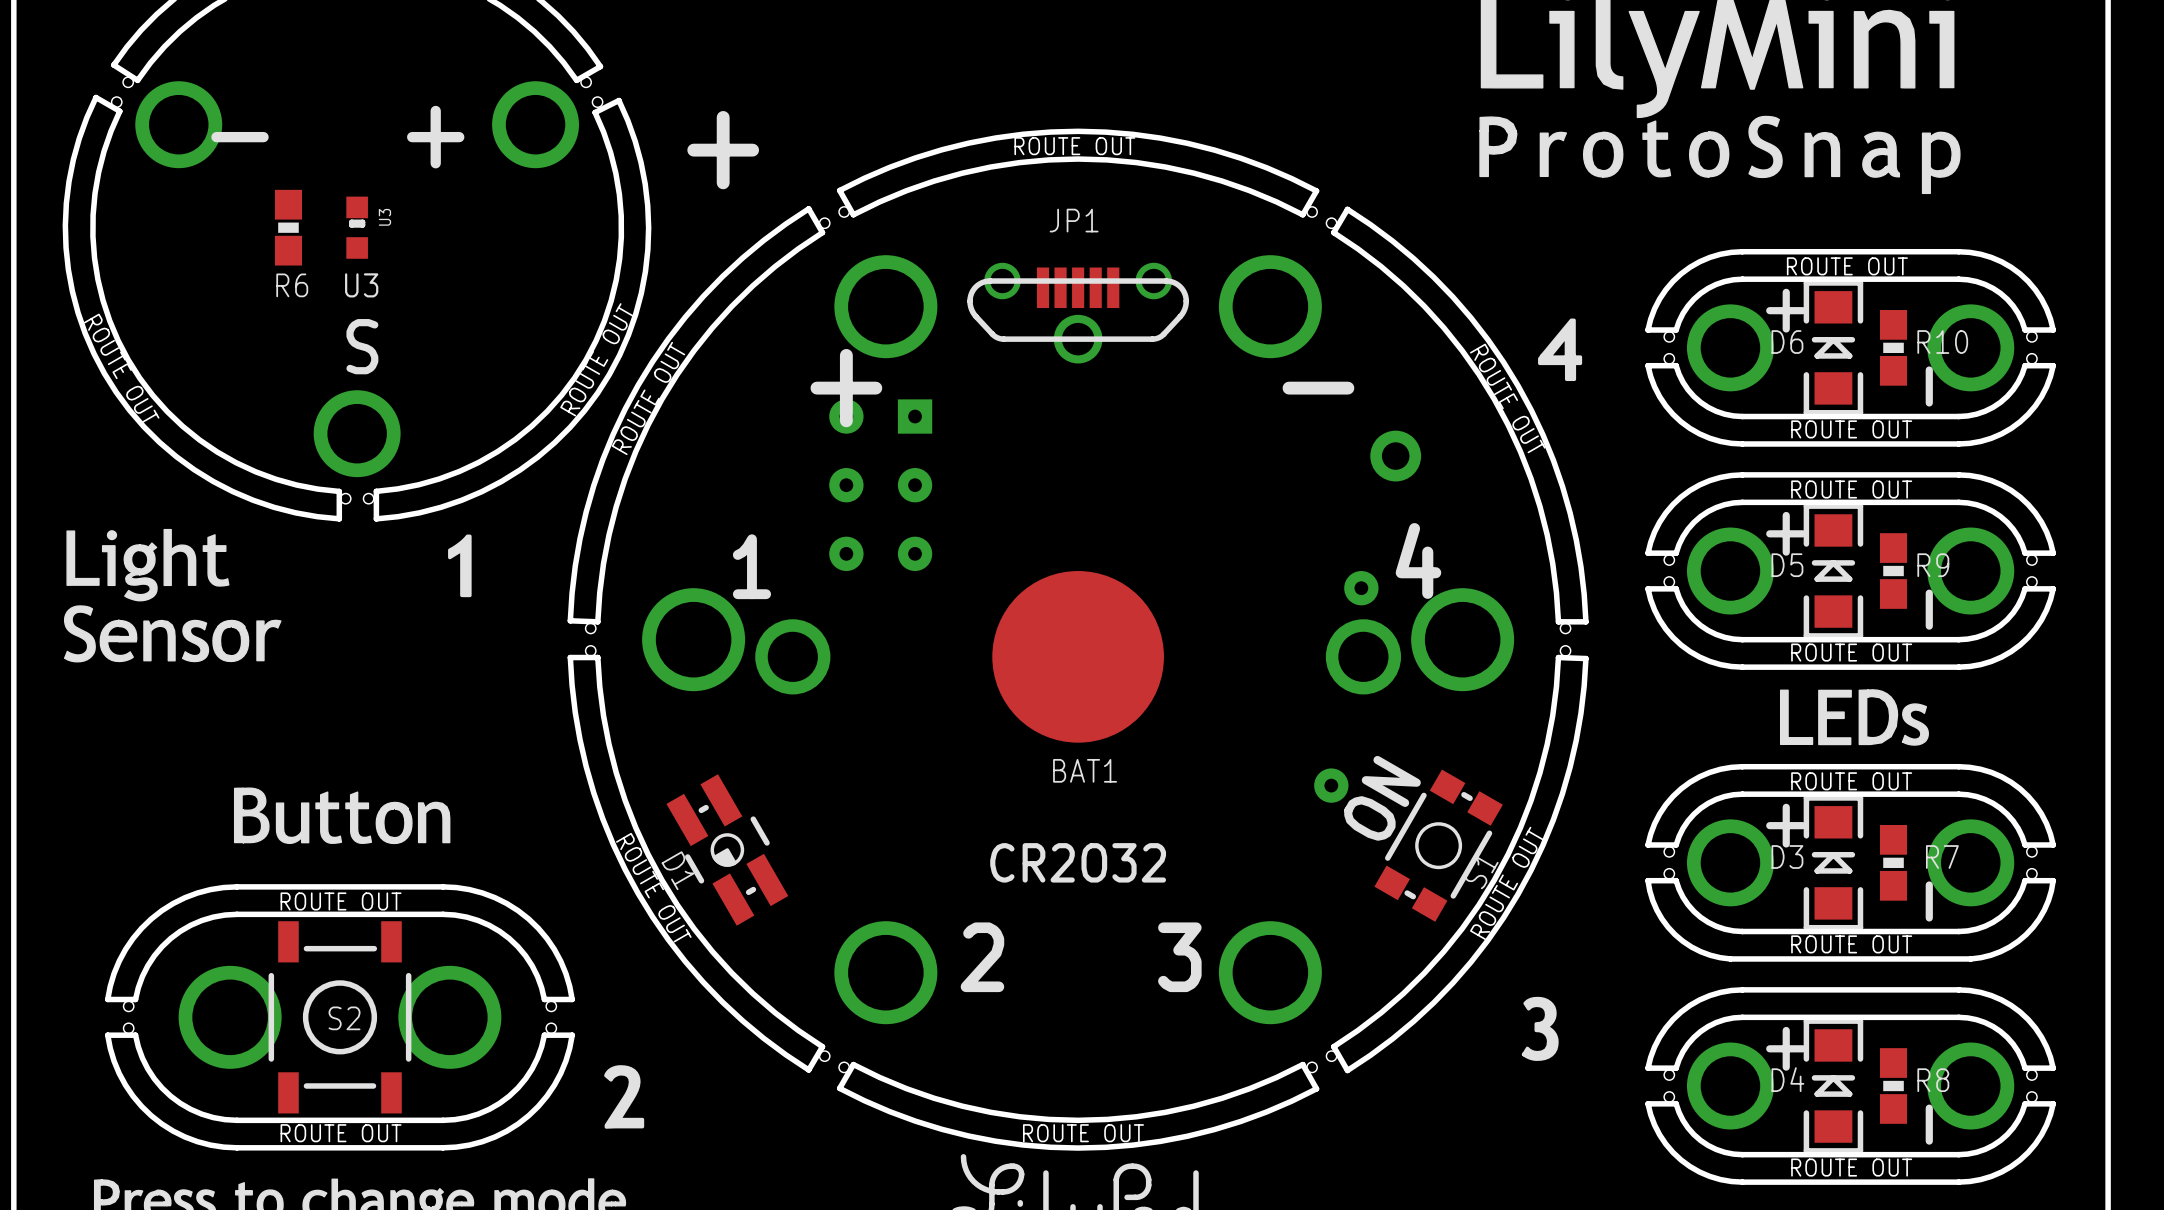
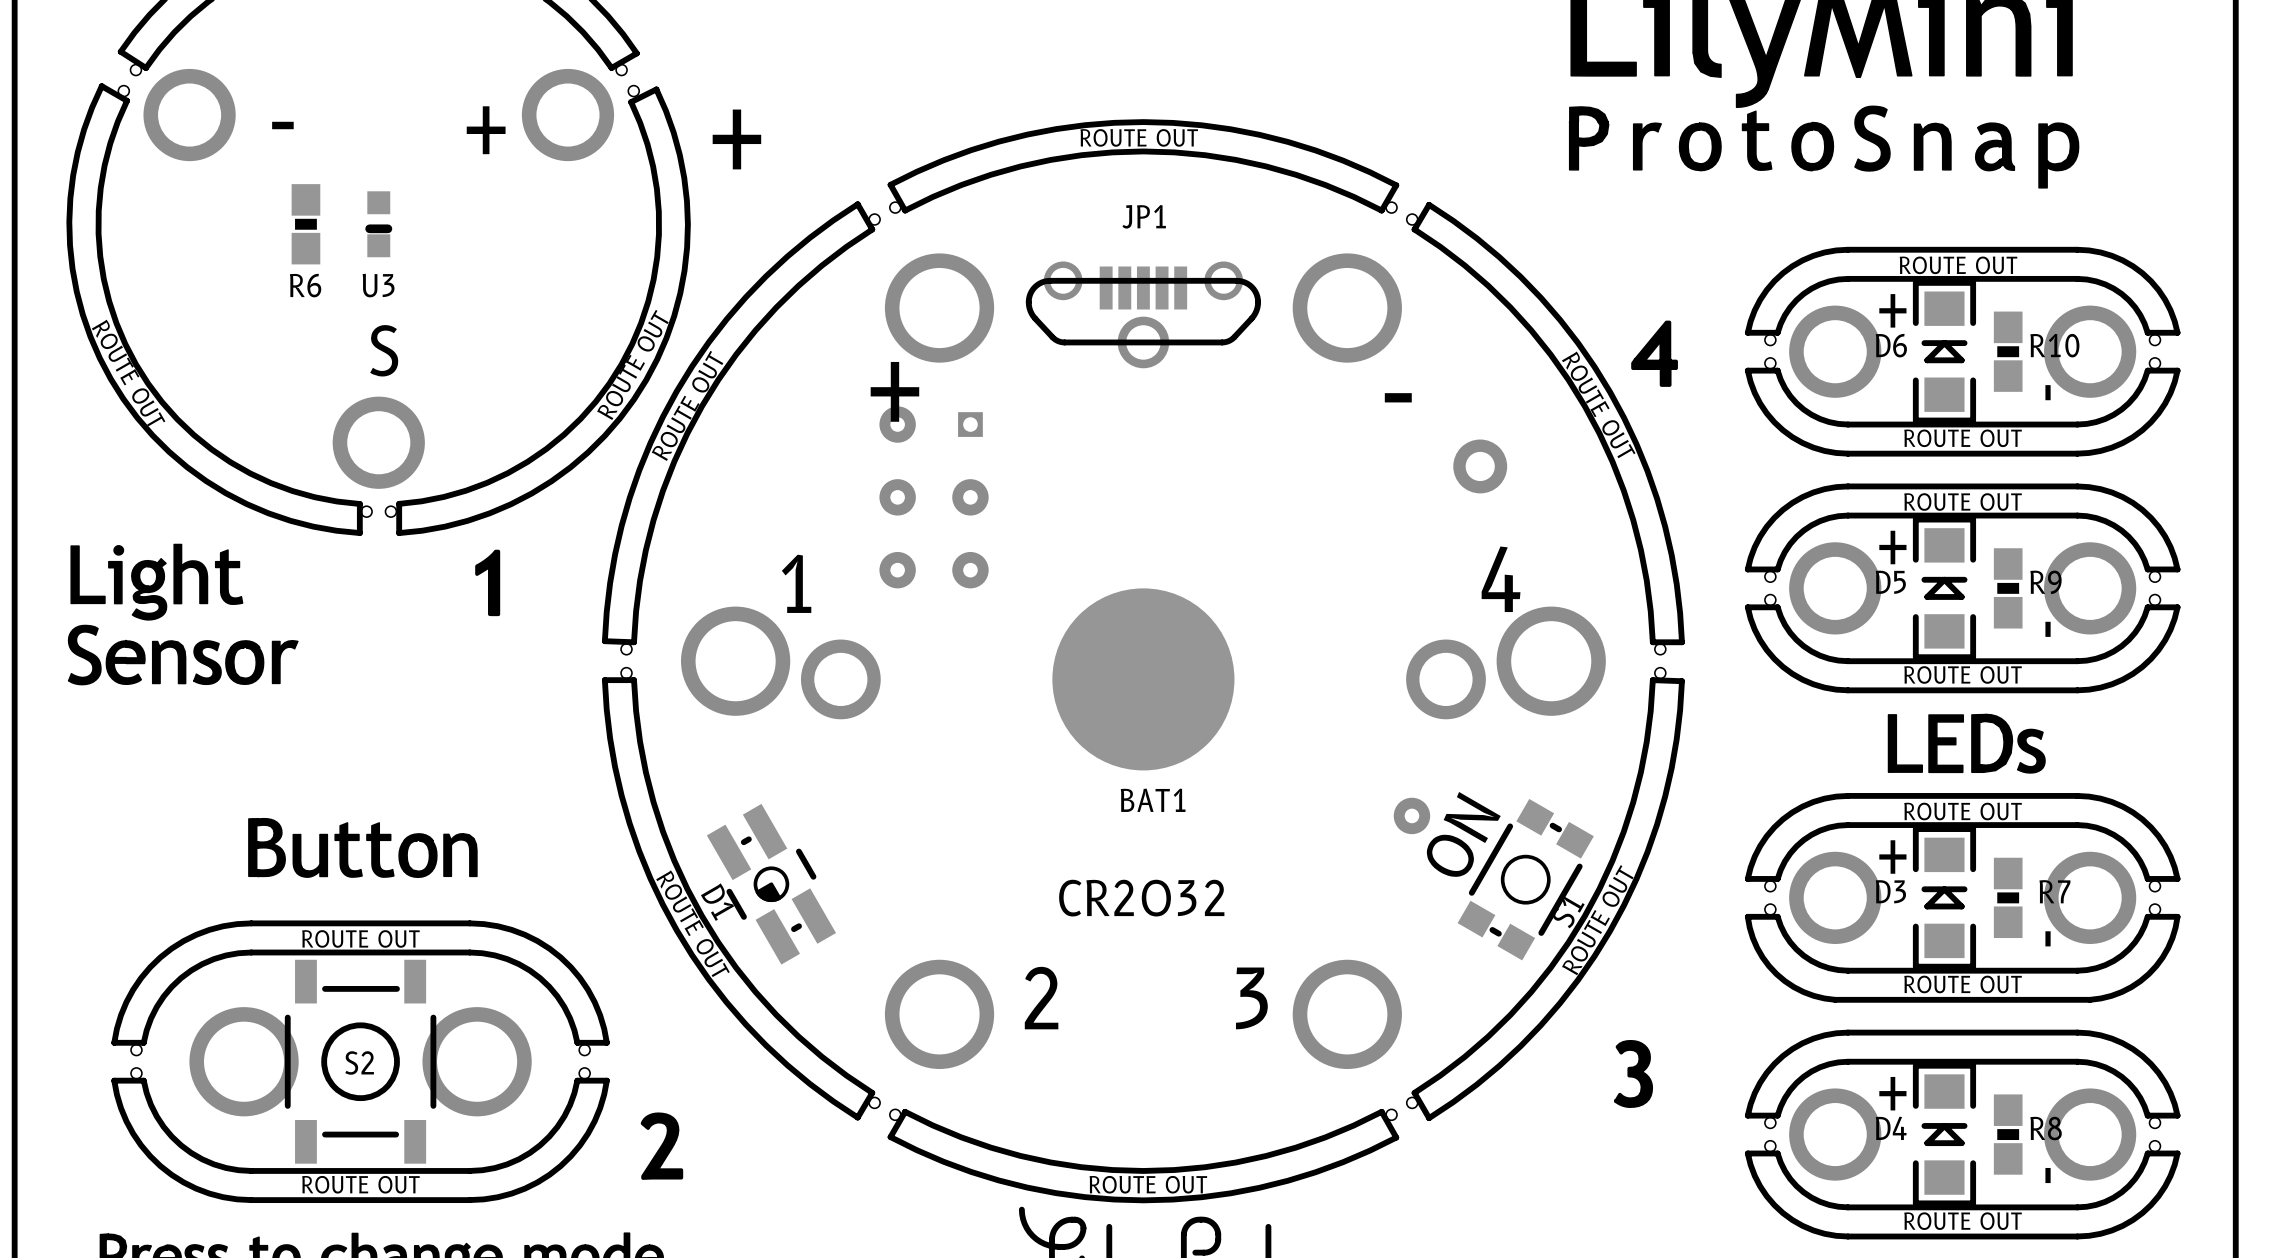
U3: (357, 227) -> none
part: none -> (378, 224)
part footprint: [897, 399, 933, 434] -> [958, 412, 983, 437]
part: (1361, 588) -> none

